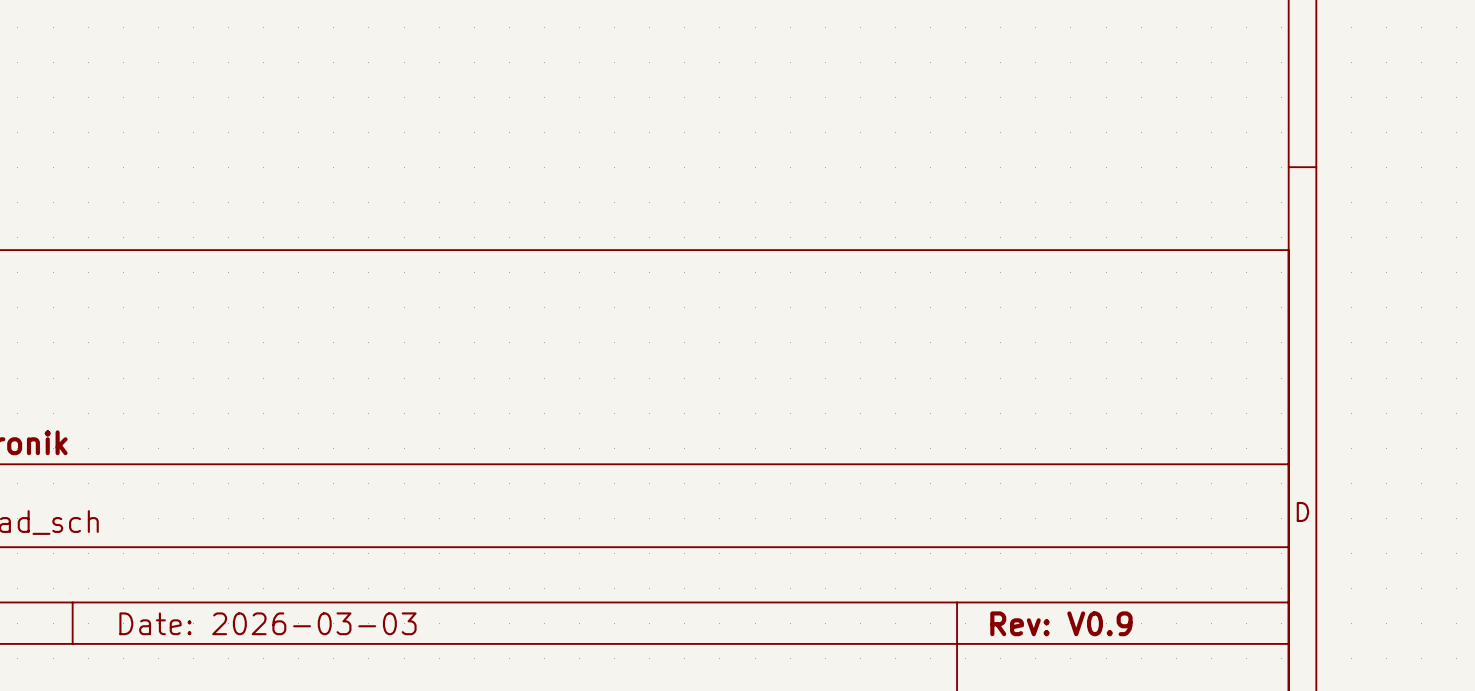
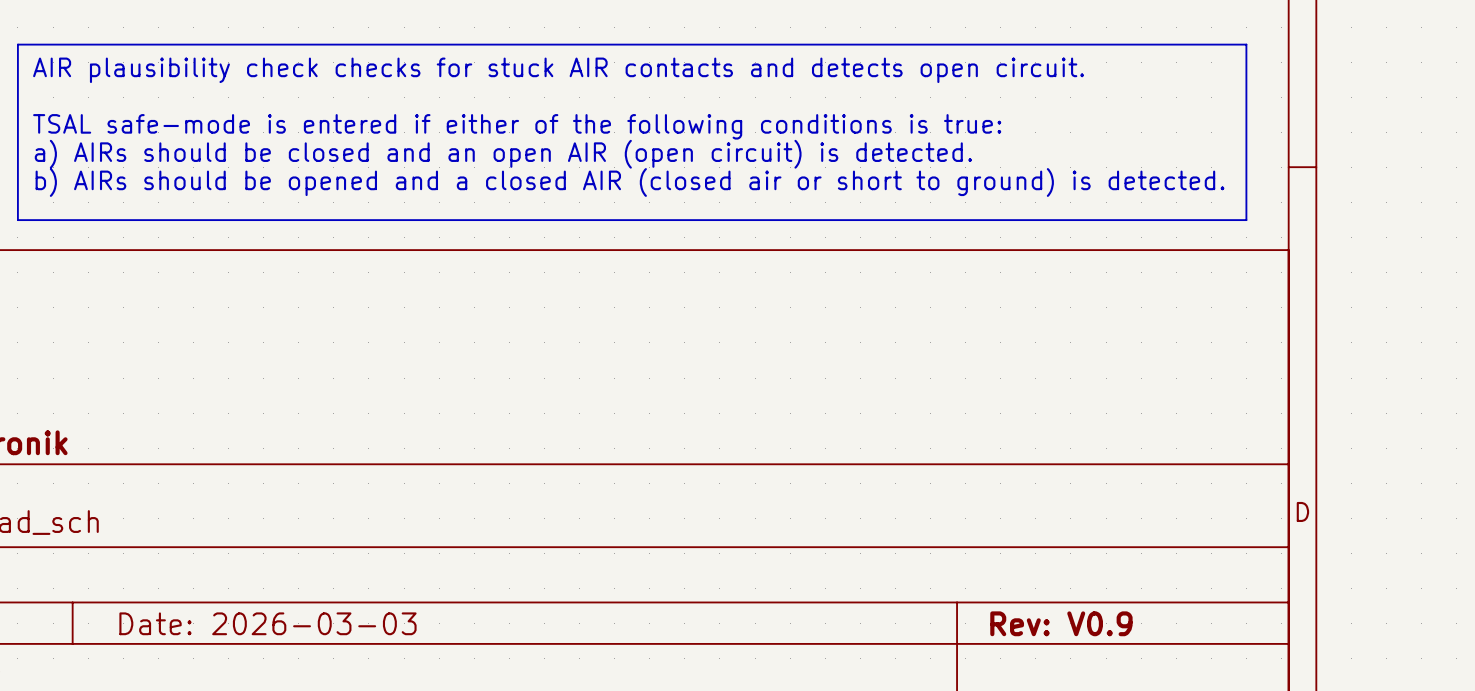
line: none -> (17, 44) (1246, 44) (1246, 220) (17, 220) (17, 44)
text: none -> AIR plausibility check checks for stuck AIR contacts and detects open circuit. (558, 70)
text: none -> TSAL safe-mode is entered if either of the following conditions is true: (517, 126)
text: none -> a) AIRs should be closed and an open AIR (open circuit) is detected. (503, 154)
text: none -> b) AIRs should be opened and a closed AIR (closed air or short to ground) is detected. (630, 182)

